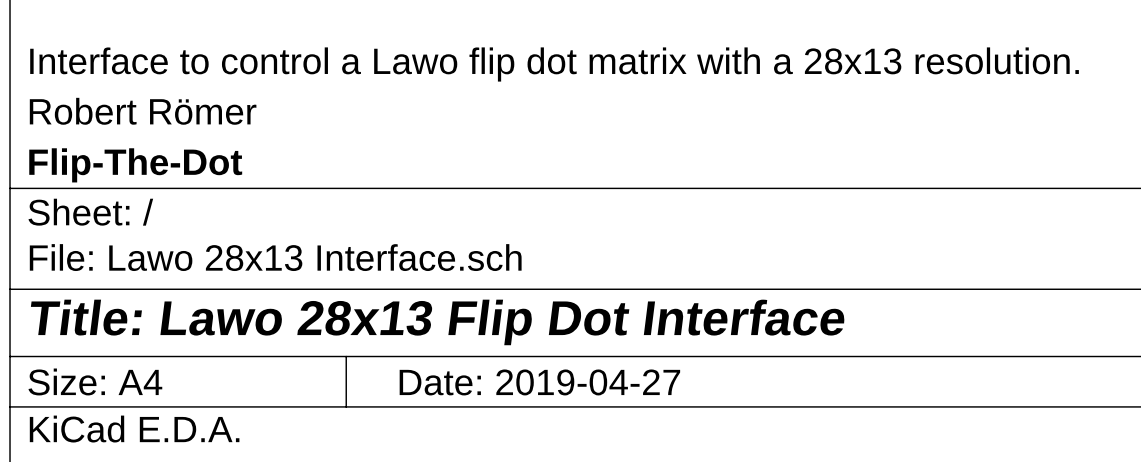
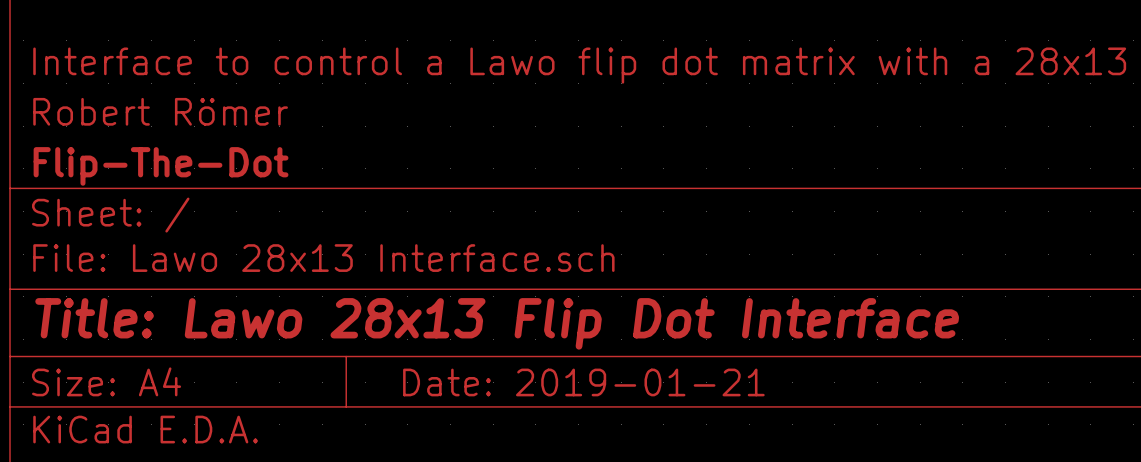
title block: Date: 2019-04-27 (539, 382) -> Date: 2019-01-21 (583, 382)

